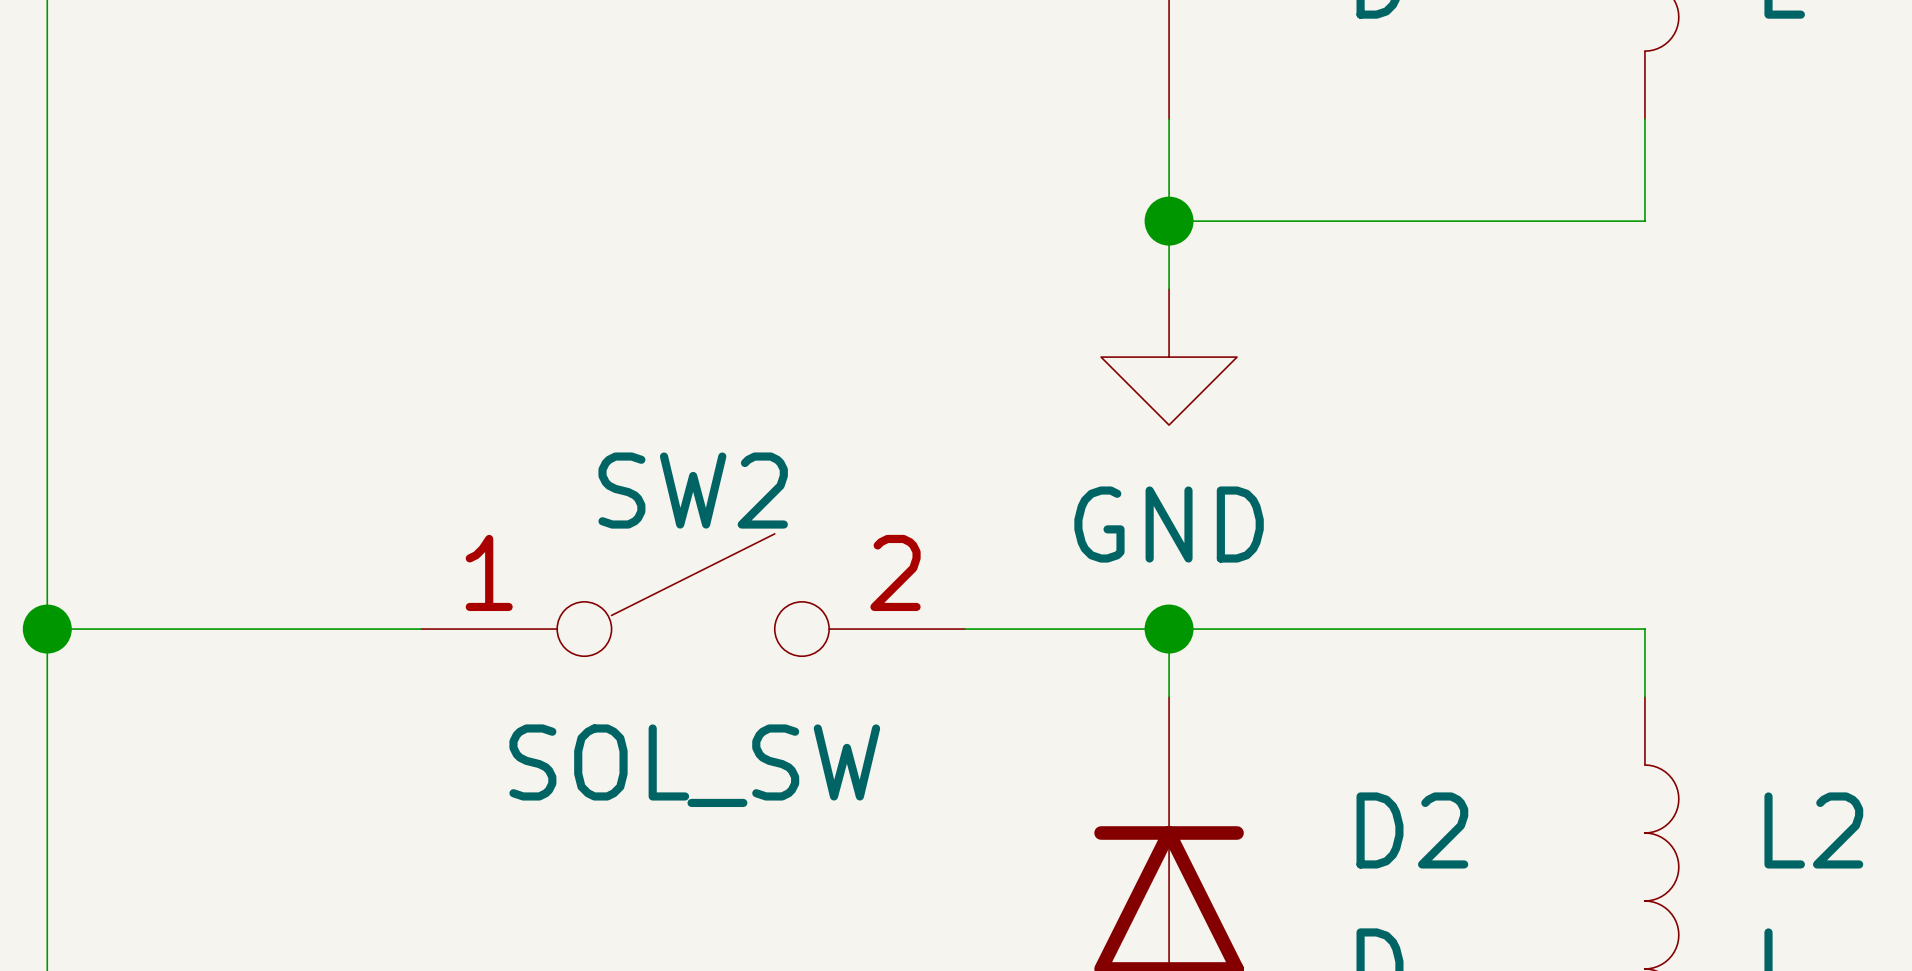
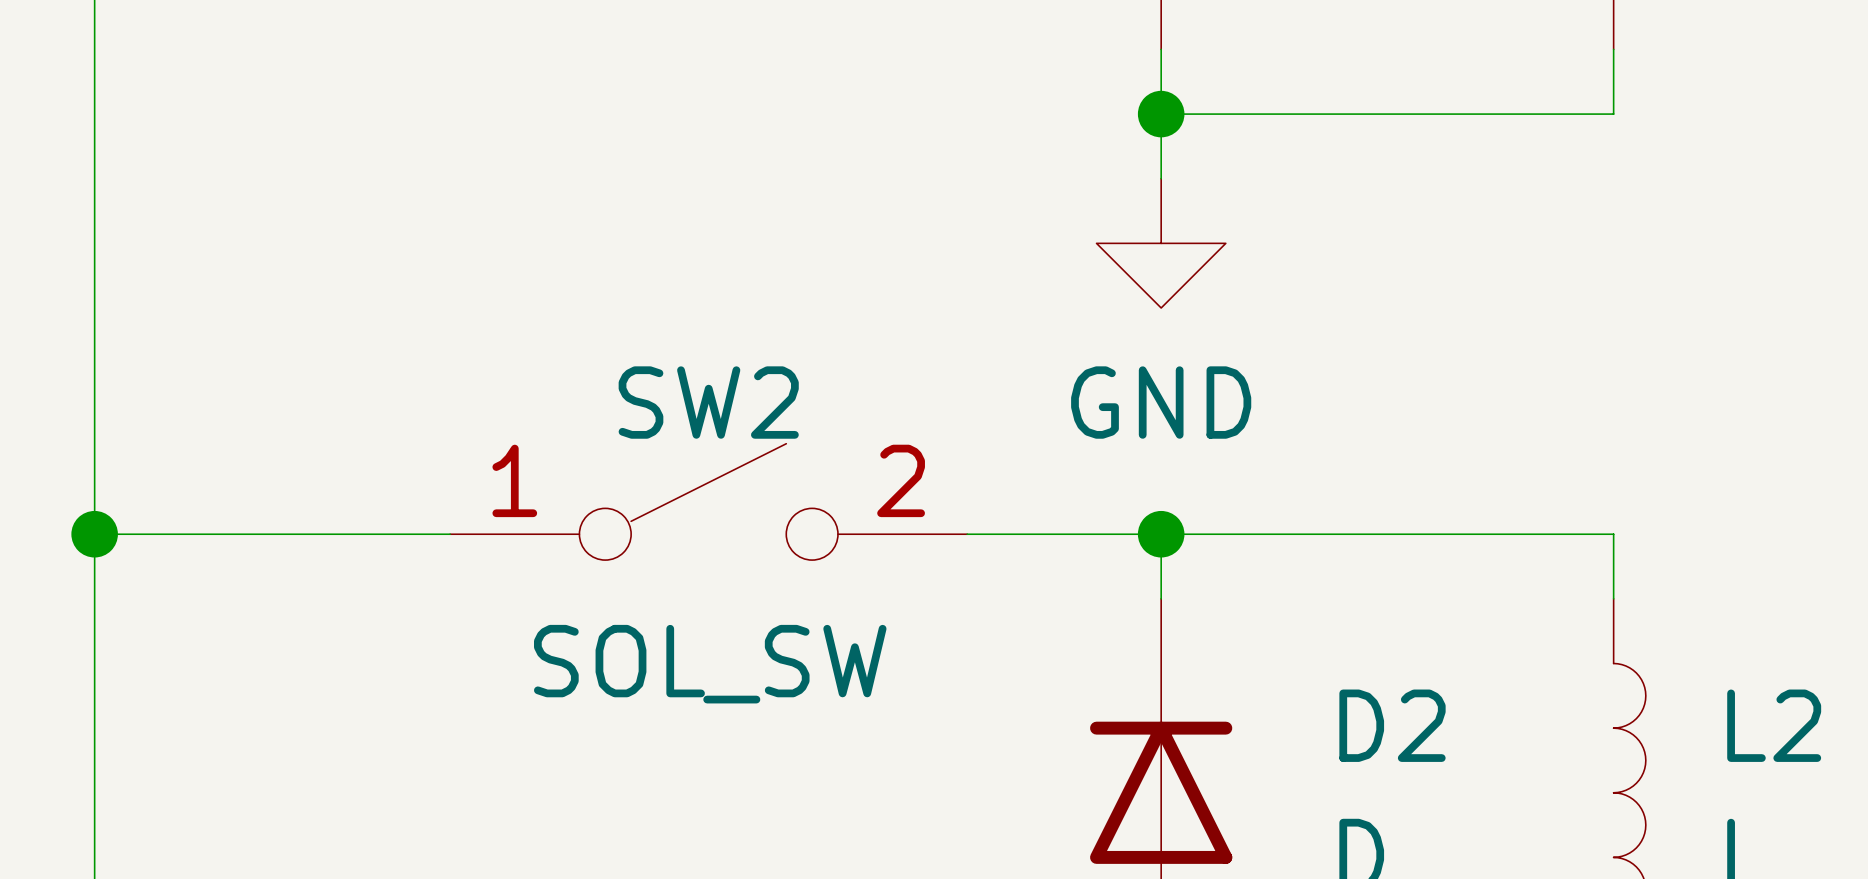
wire: (1644, 187) (1644, 221) (1169, 221) -> (1613, 114) (1161, 114)
junction position: (1169, 221) -> (1161, 114)
power symbol position: GND (1169, 357) -> GND (1161, 243)

